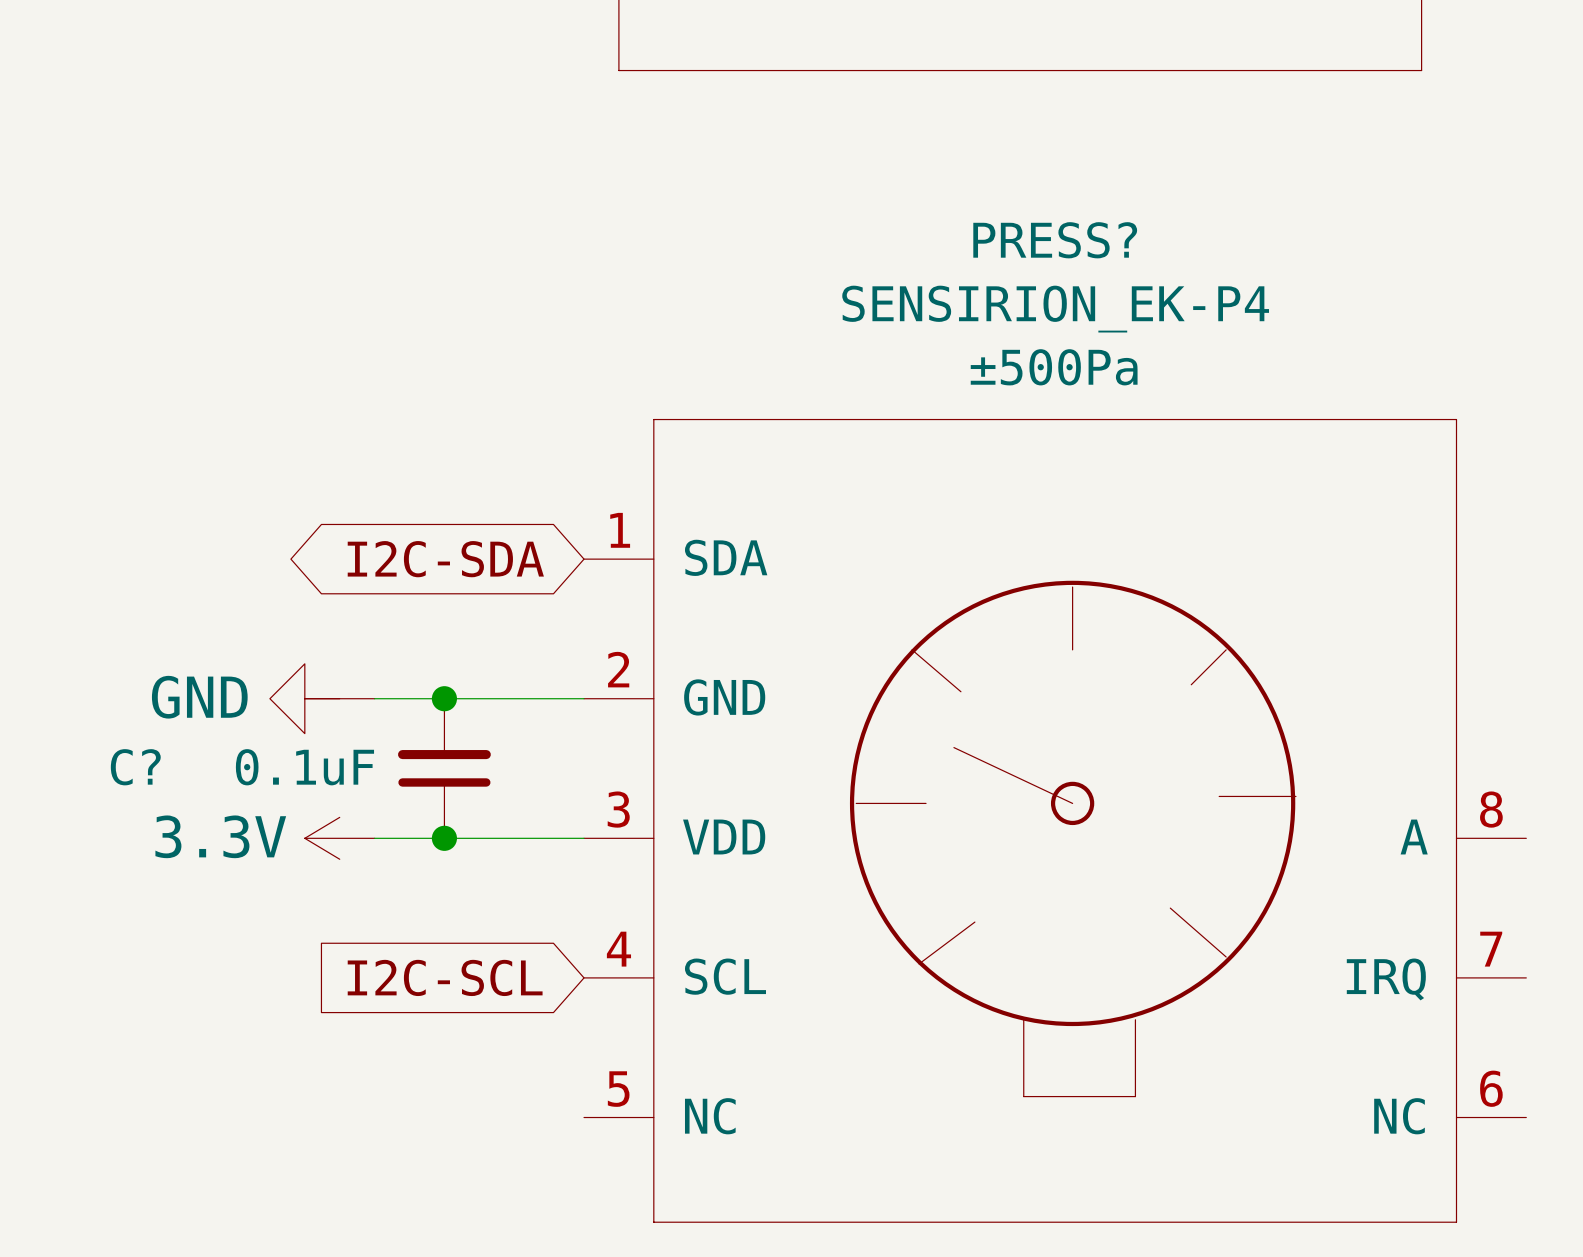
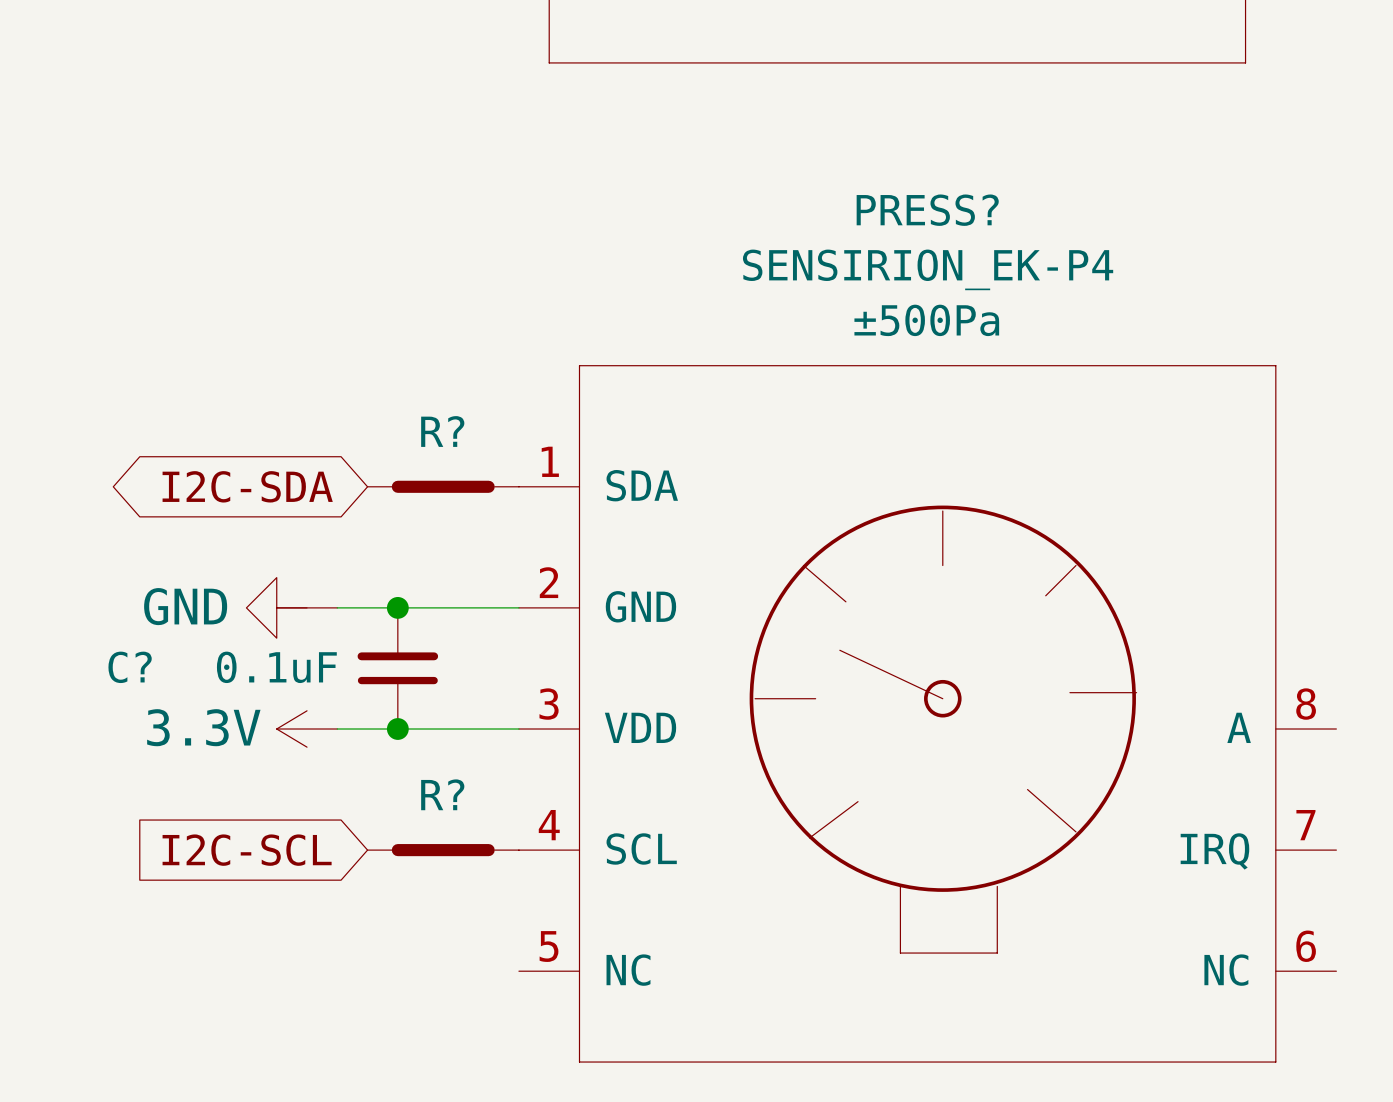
global label position: I2C-SDA (445, 559) -> I2C-SDA (247, 486)
R?: none -> (443, 486)
global label position: I2C-SCL (445, 977) -> I2C-SCL (247, 850)
R?: none -> (443, 850)

